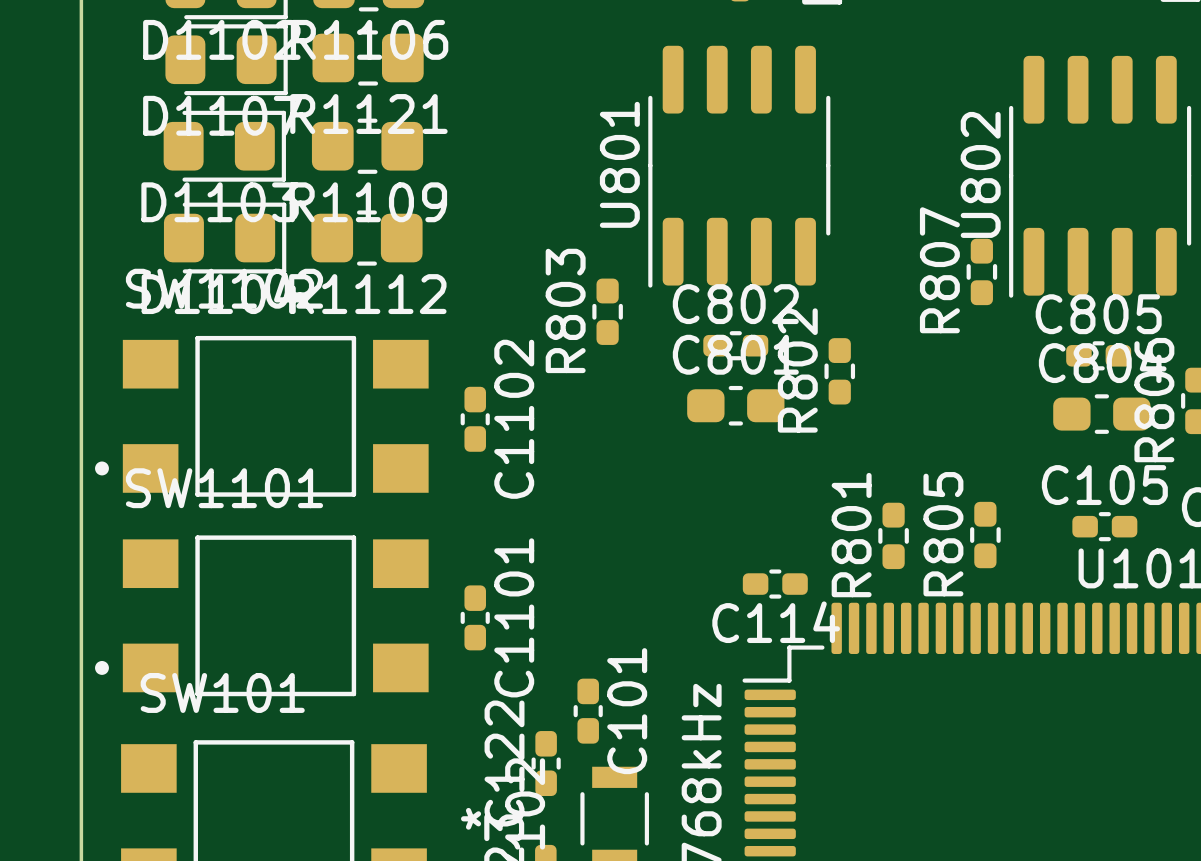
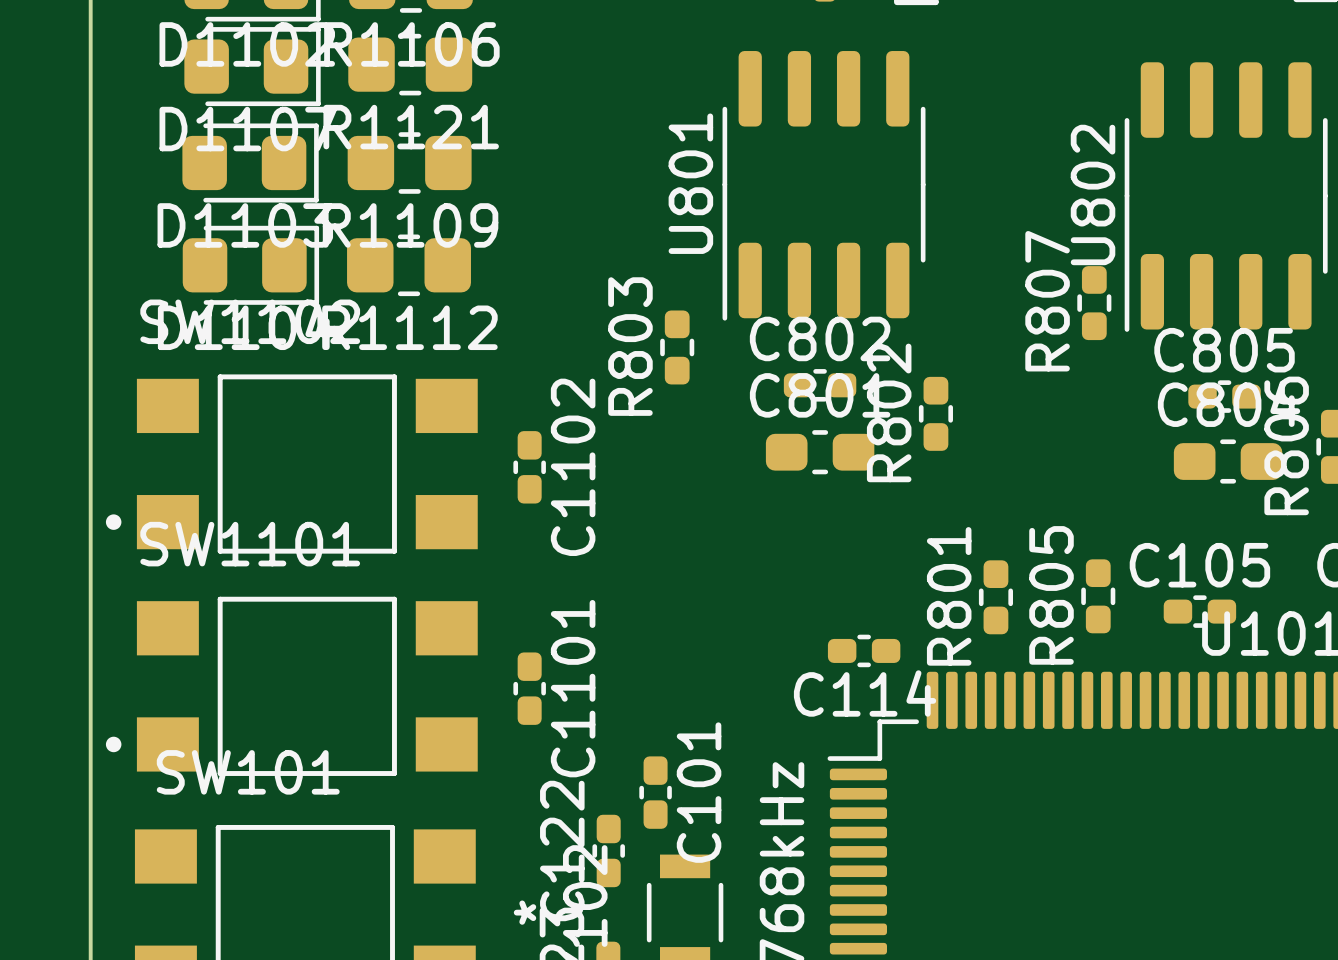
C105 position: (1104, 526) -> (1199, 611)

